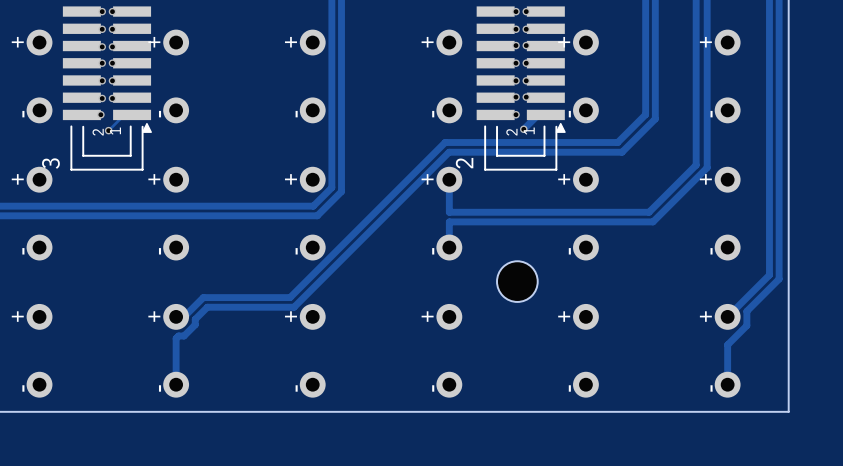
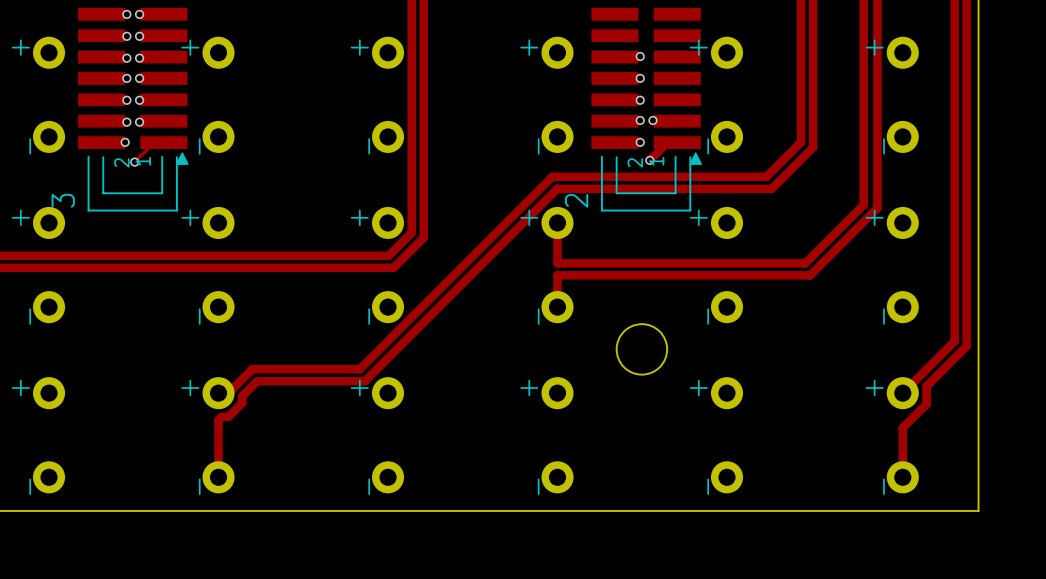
via: (516, 11) -> none
via: (526, 11) -> none
via: (516, 29) -> none
via: (526, 29) -> none
via: (526, 45) -> none
via: (526, 63) -> none
via: (526, 80) -> none

